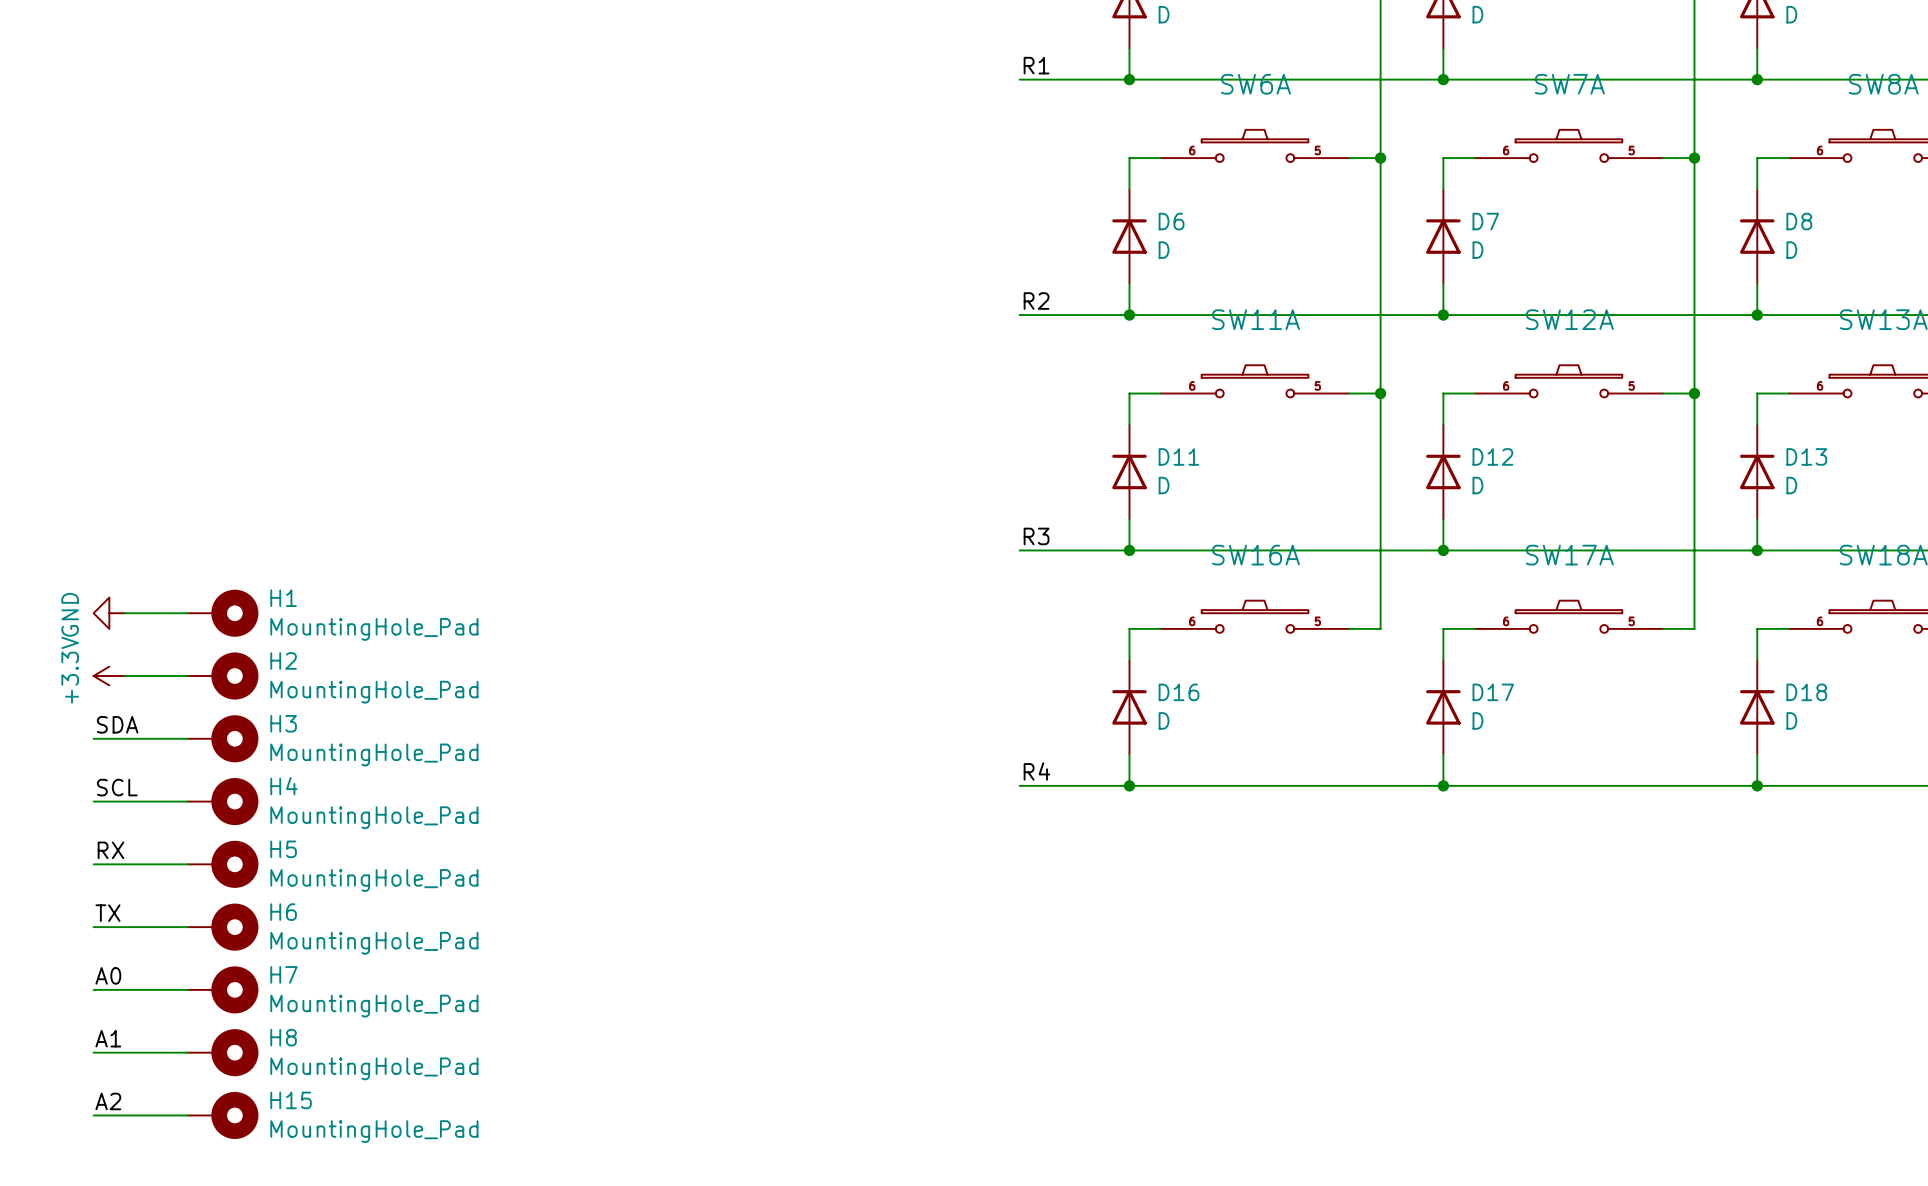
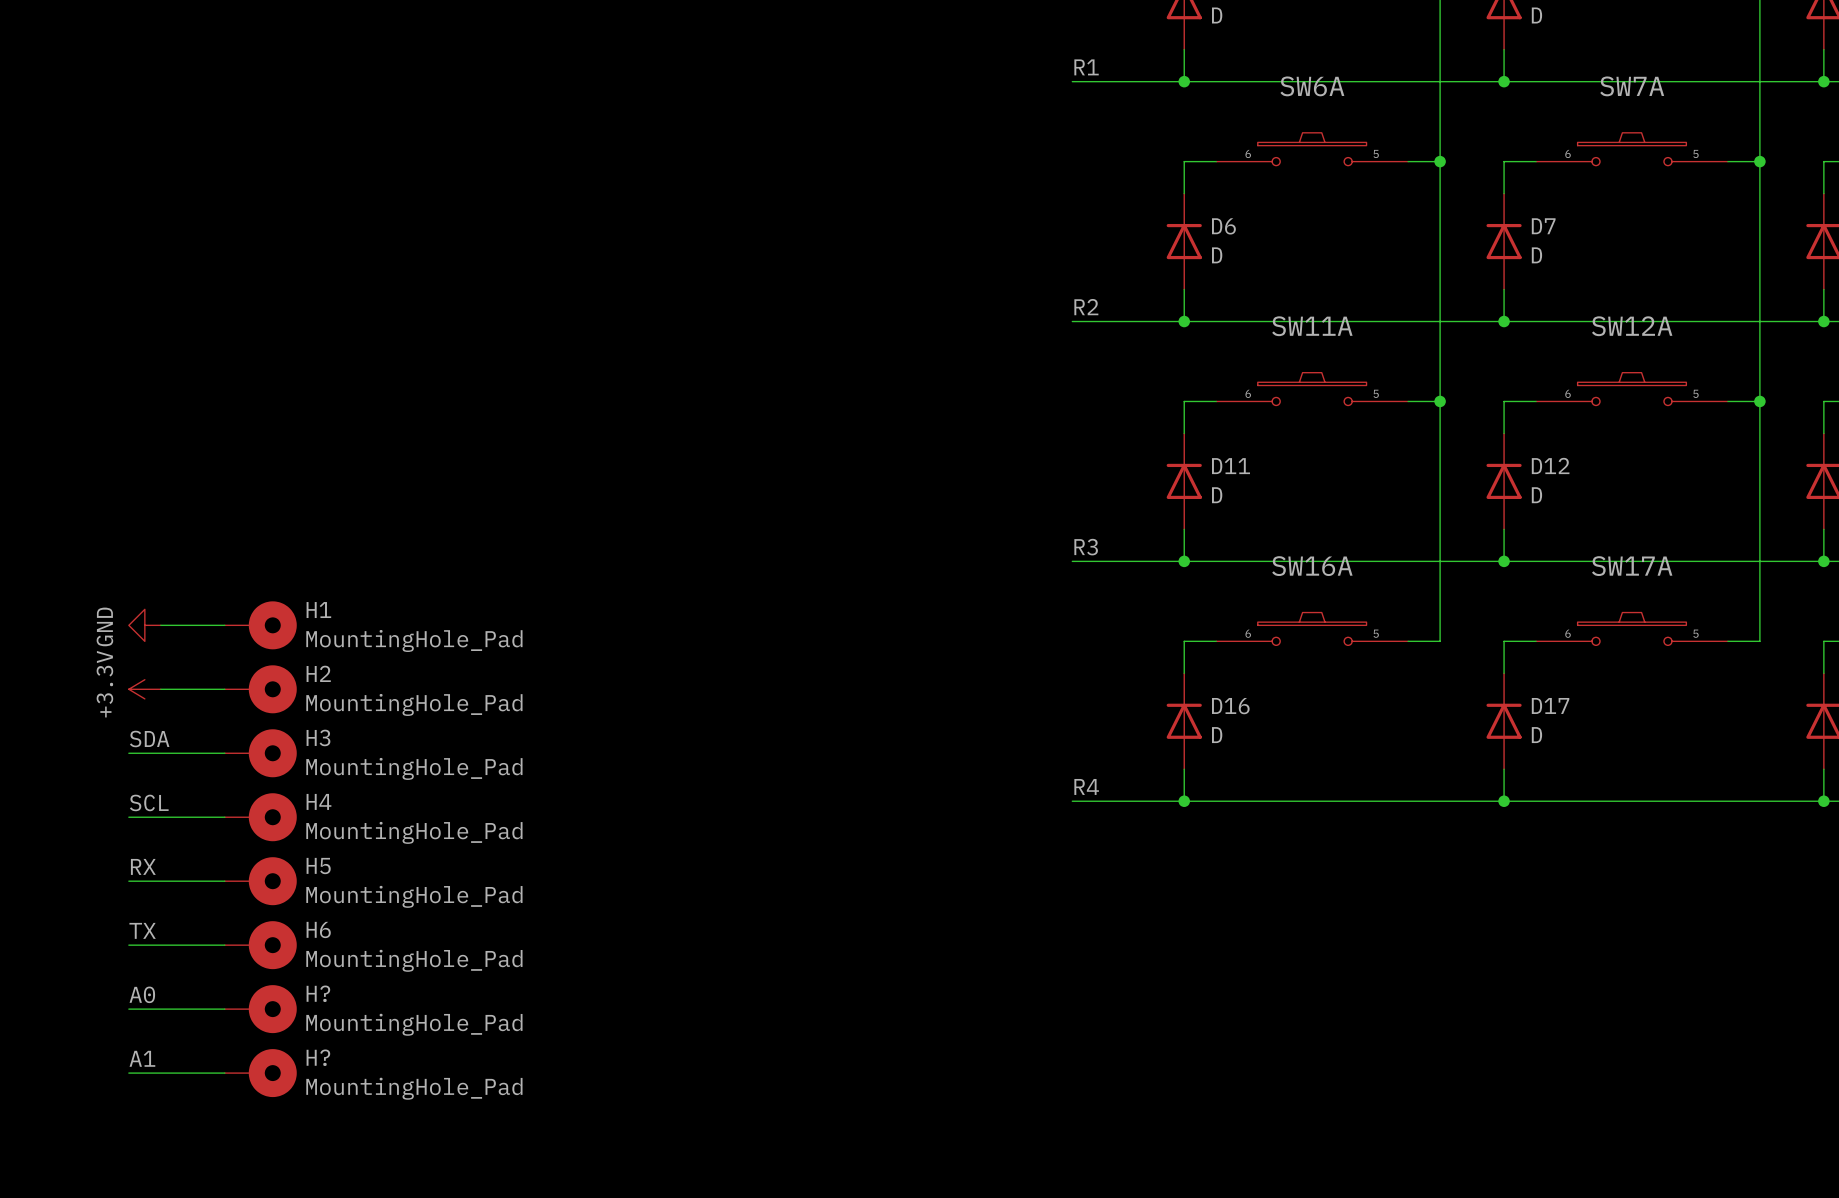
H7 name: H7 (283, 974) -> H? (318, 993)
H8 name: H8 (283, 1037) -> H? (318, 1057)
label: A2 (108, 1101) -> none
wire: (93, 1115) (187, 1115) -> none
H15: MountingHole_Pad (223, 1115) -> none

